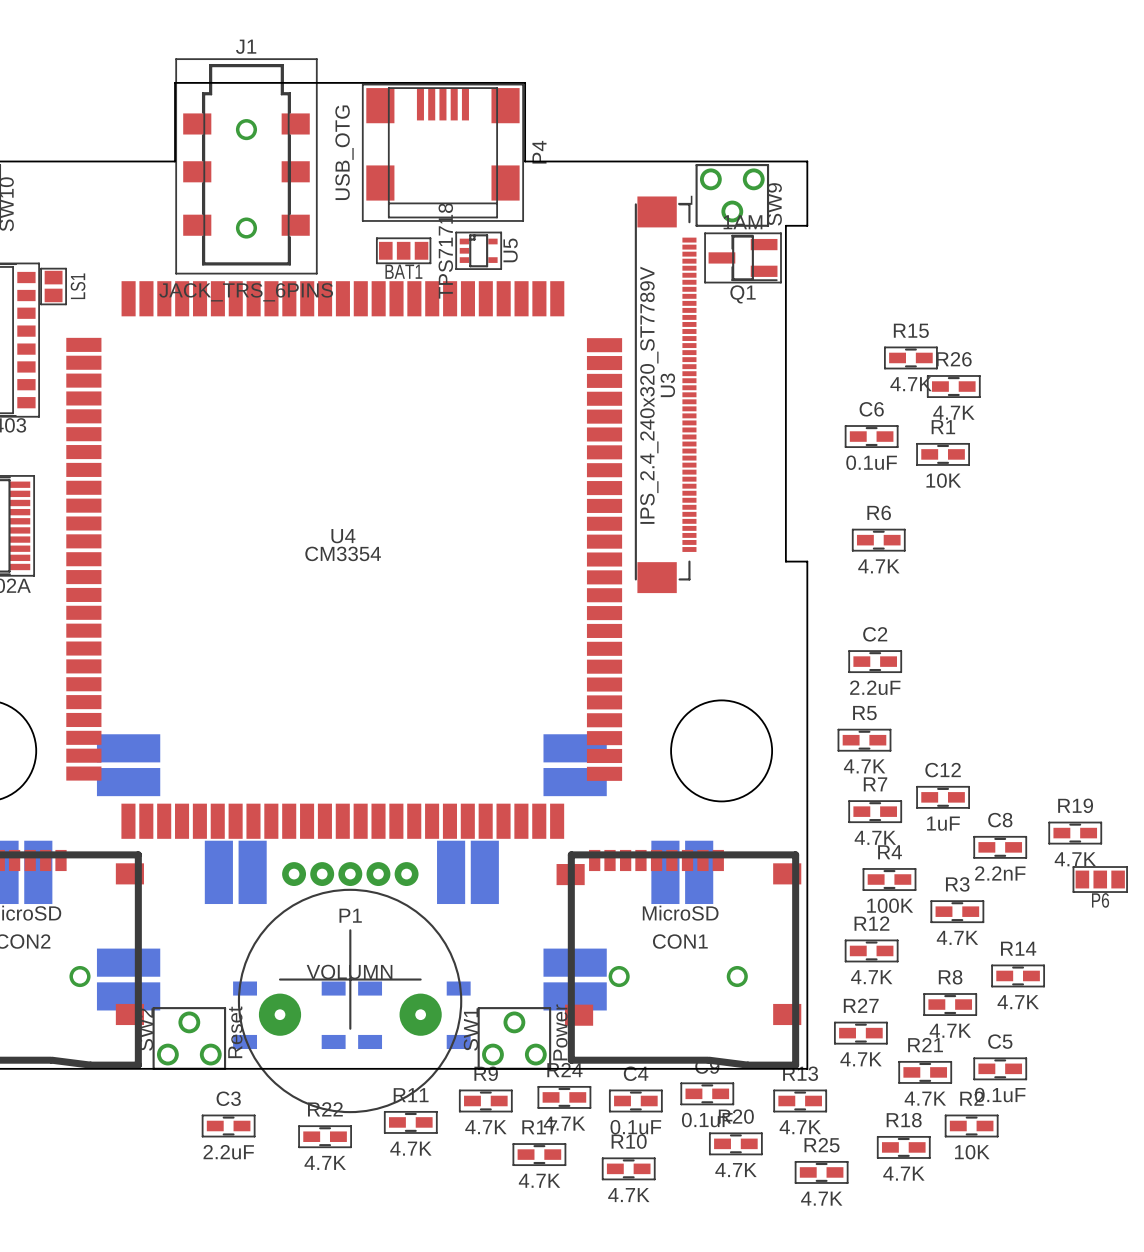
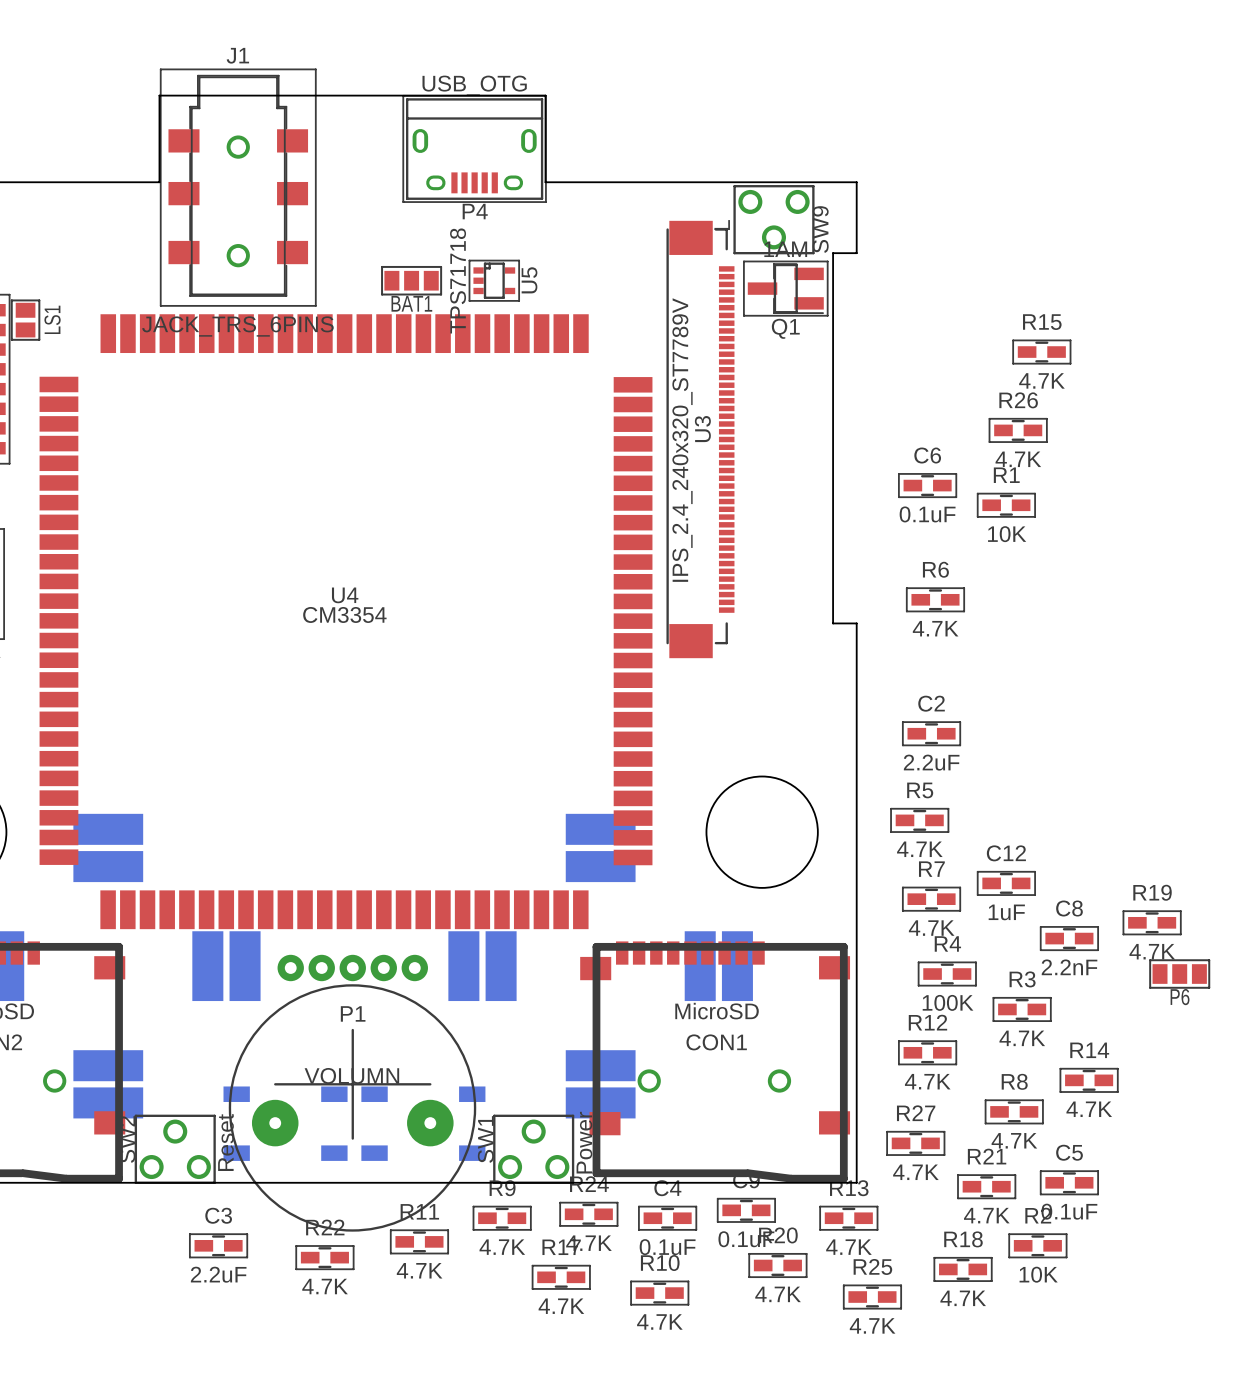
P4 footprint: [362, 84, 524, 222] -> [402, 95, 547, 203]
P4 value position: USB_OTG (344, 152) -> USB_OTG (474, 85)
P4 name position: P4 (539, 152) -> P4 (475, 211)
R15 position: (910, 357) -> (1041, 352)

